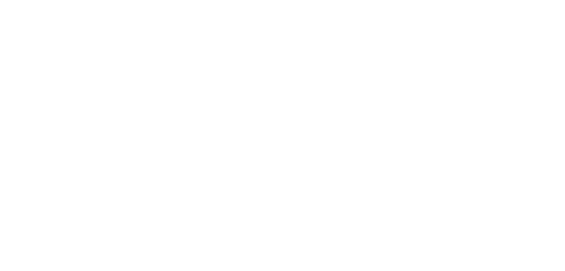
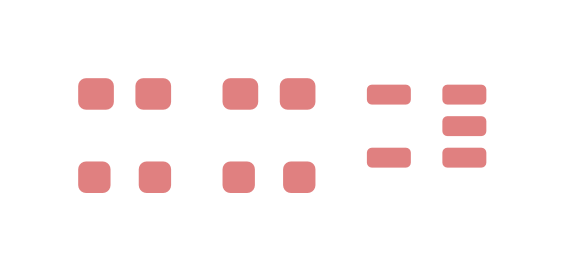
part: none -> (124, 93)
part: none -> (268, 93)
part: none -> (426, 126)
part: none -> (124, 177)
part: none -> (268, 177)

